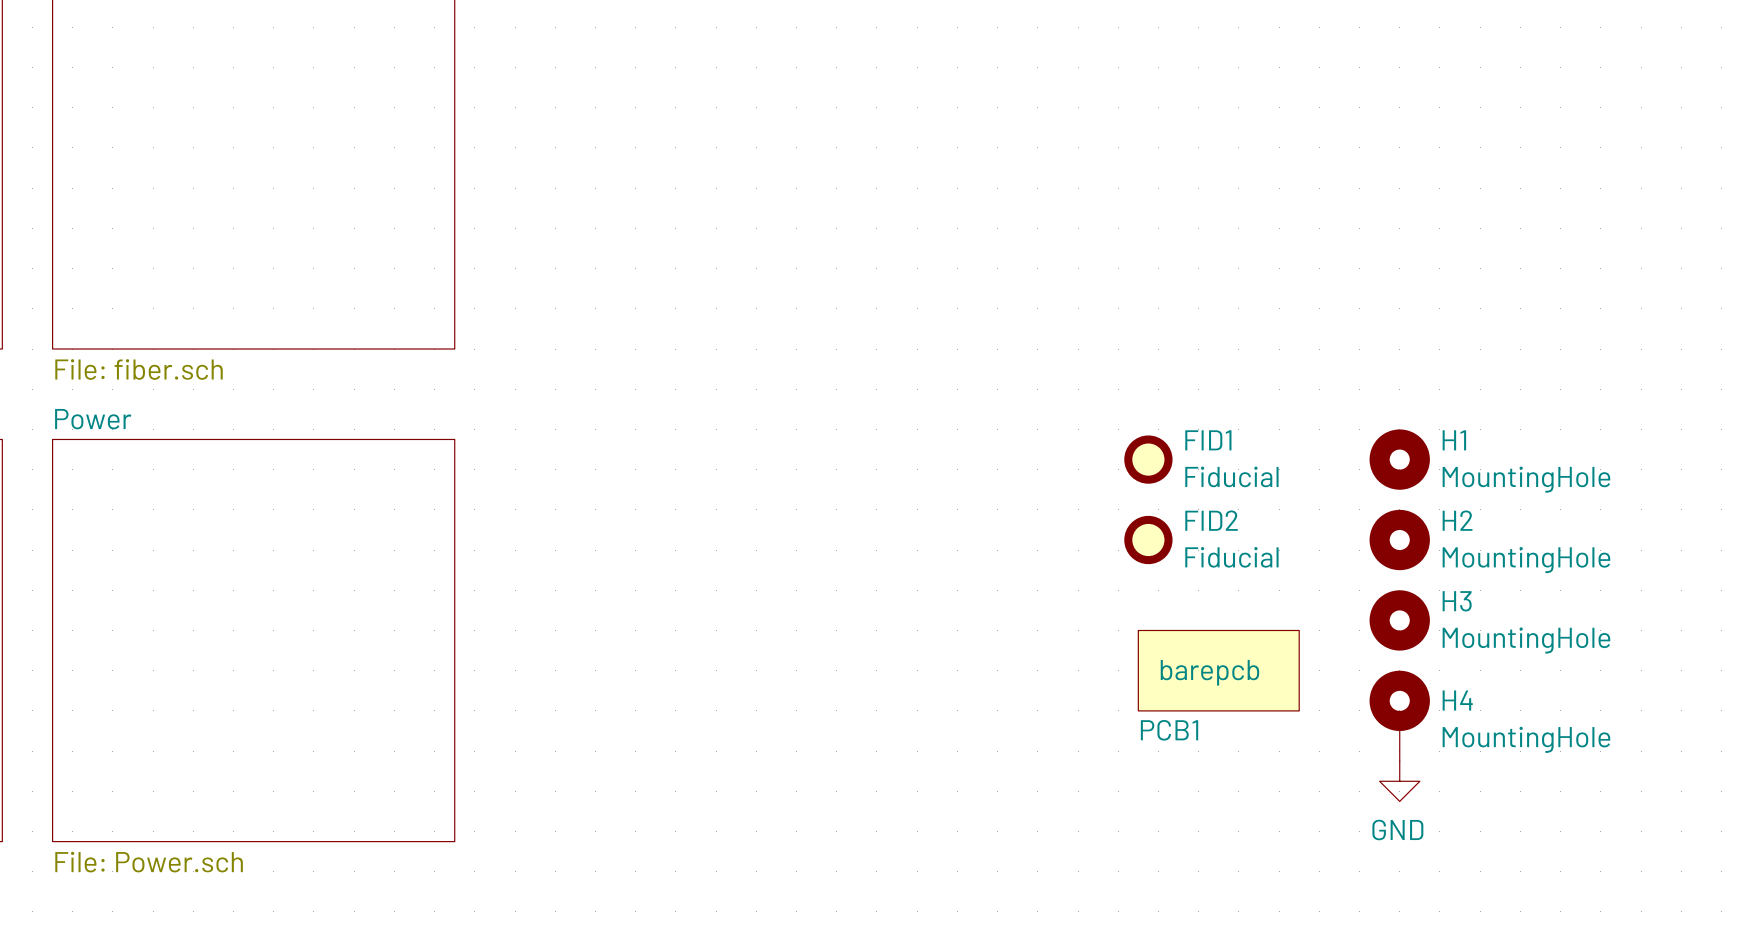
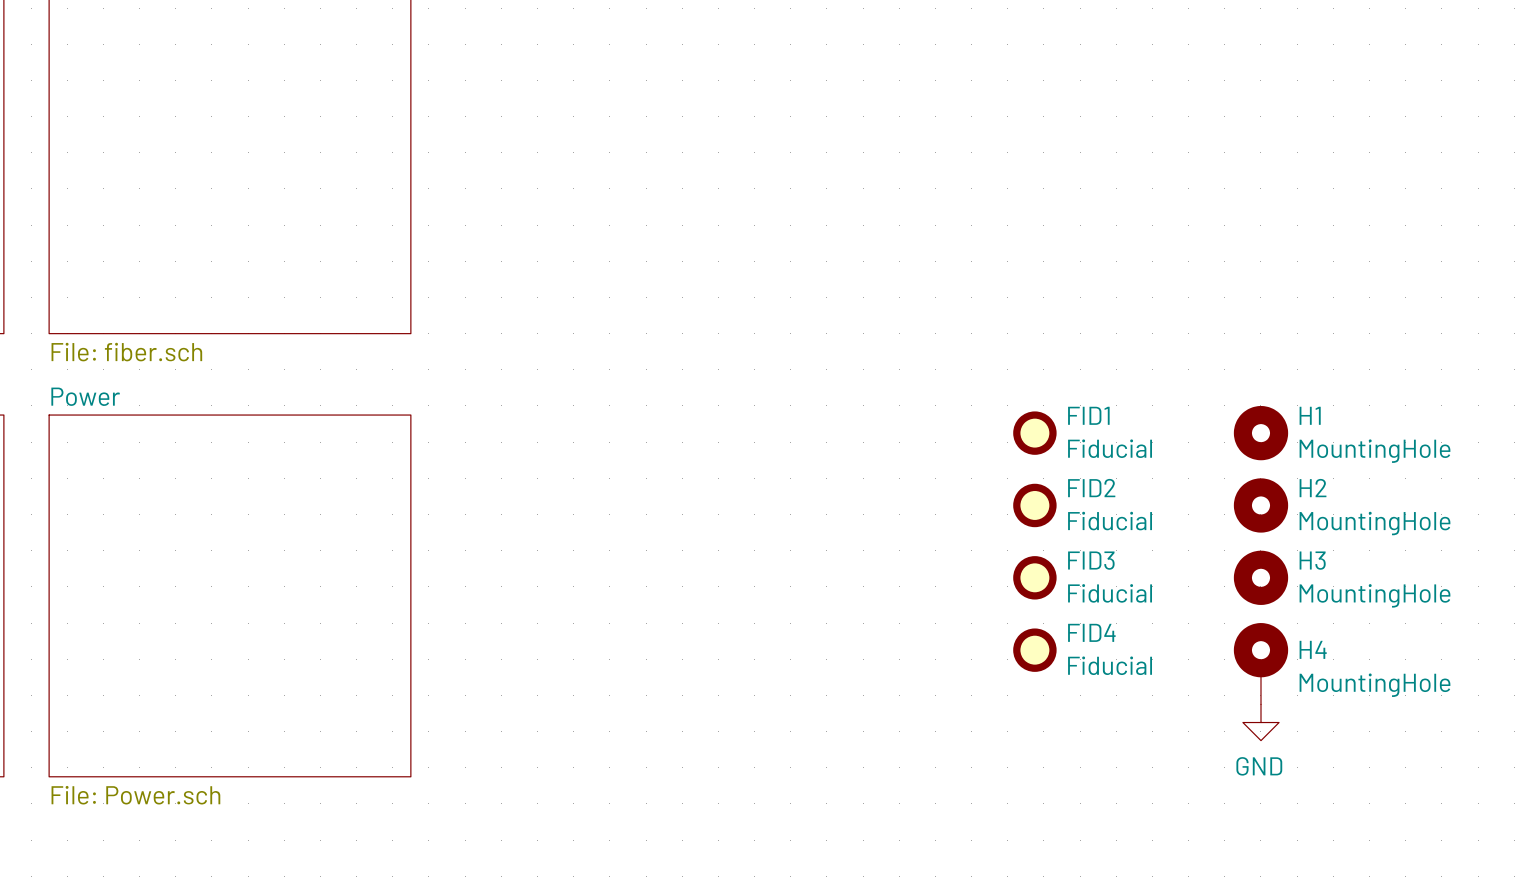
FID3: none -> Fiducial (1034, 577)
PCB1: barepcb (1218, 670) -> none
FID4: none -> Fiducial (1034, 650)

